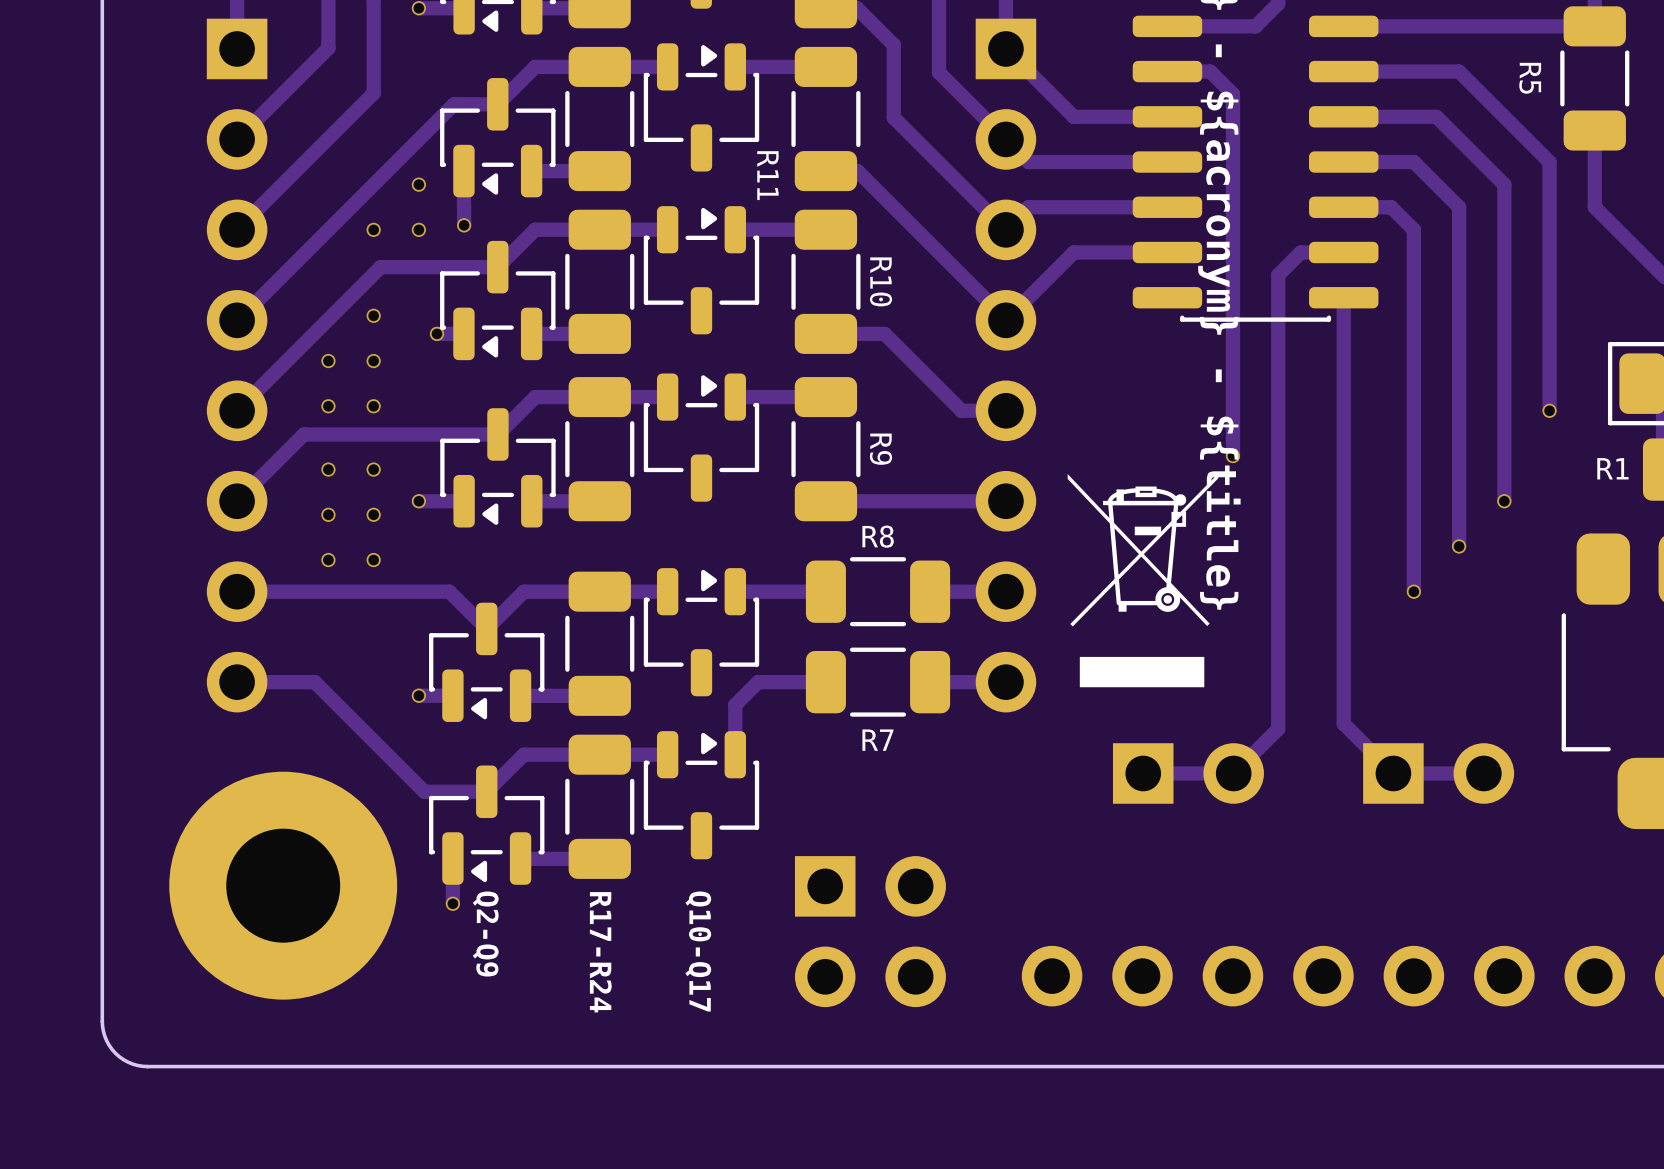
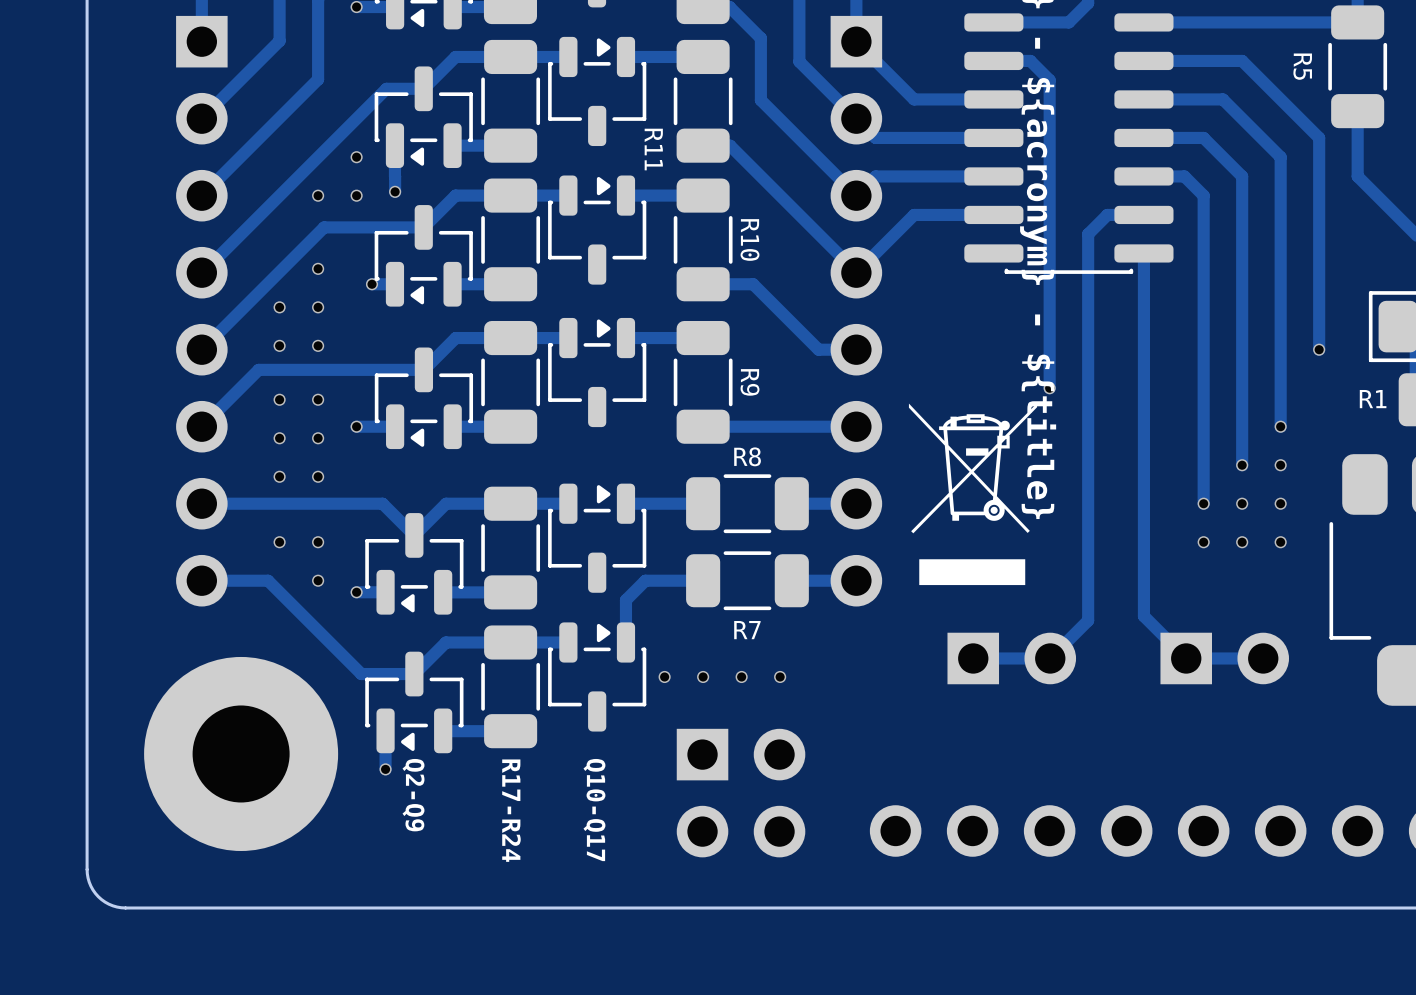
via: none -> (1280, 465)
via: none -> (1242, 503)
via: none -> (1280, 503)
via: none -> (279, 542)
via: none -> (318, 542)
via: none -> (1203, 542)
via: none -> (1242, 542)
via: none -> (1280, 542)
via: none -> (318, 580)
via: none -> (664, 676)
via: none -> (703, 676)
via: none -> (741, 676)
via: none -> (780, 676)

